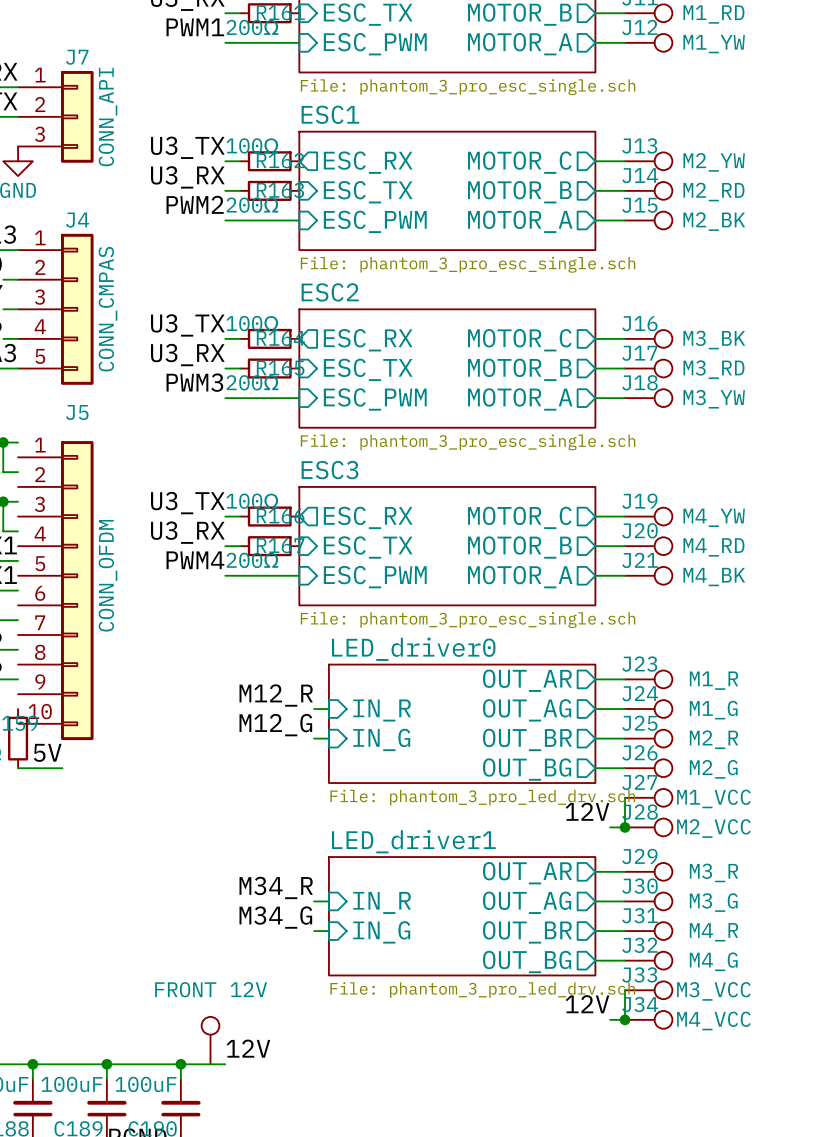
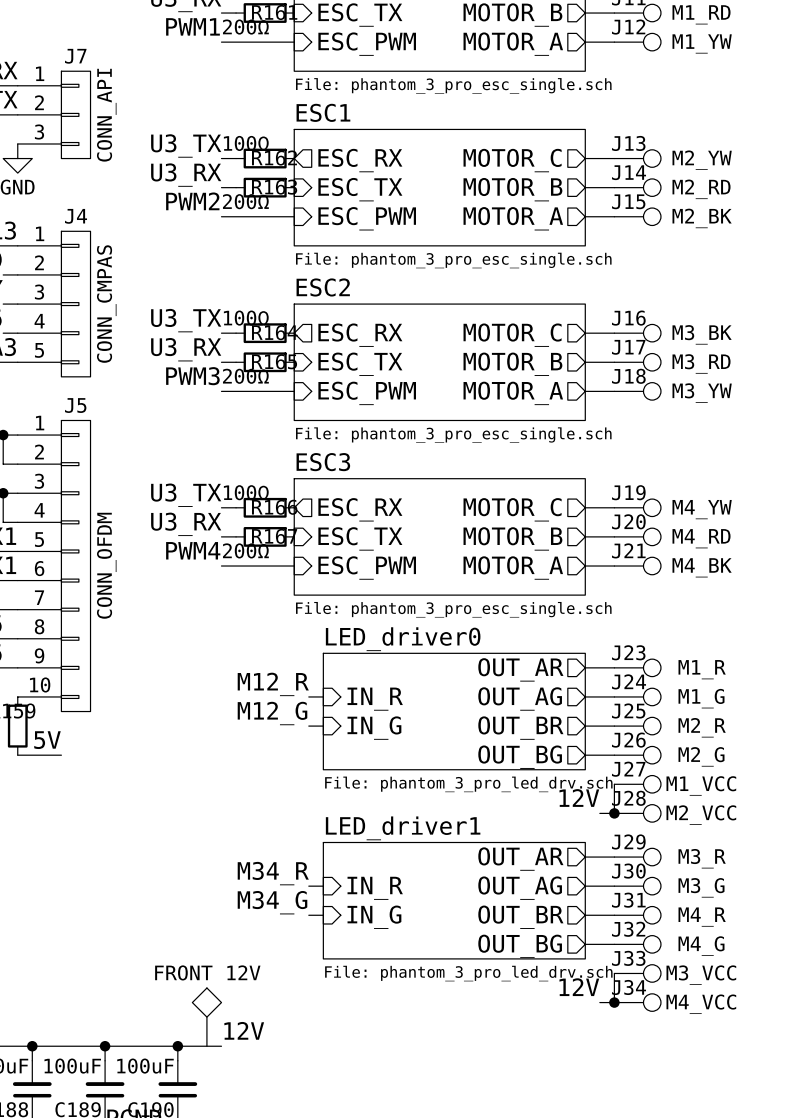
J7 symbol: [18, 70, 94, 163] -> [17, 71, 91, 159]
J4 symbol: [18, 233, 94, 385] -> [17, 231, 91, 377]
J5 symbol: [18, 441, 94, 741] -> [17, 420, 91, 712]
part symbol: [201, 1016, 220, 1065] -> [192, 988, 222, 1047]

